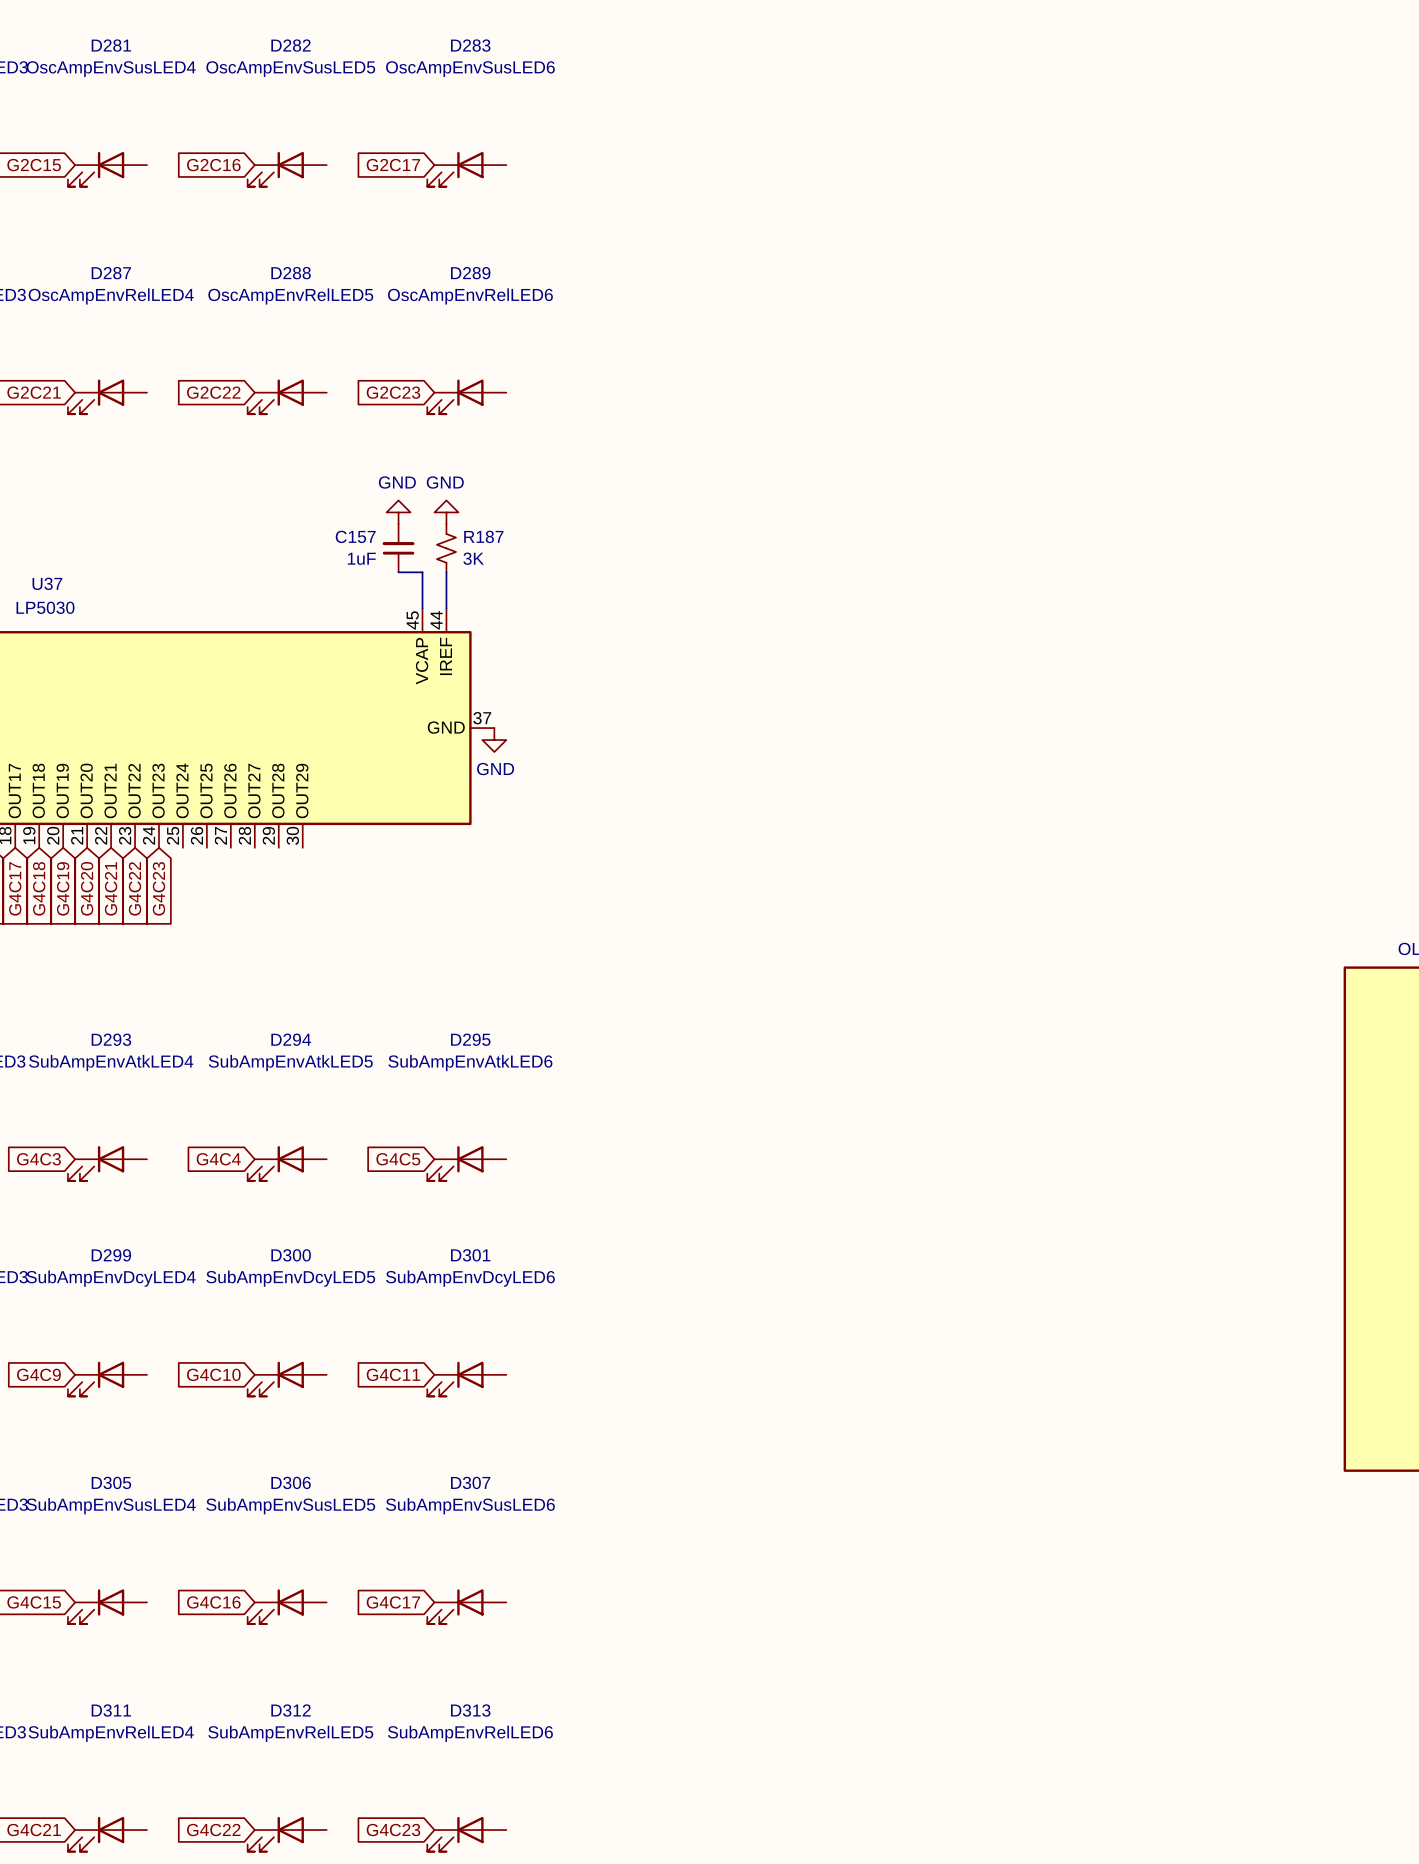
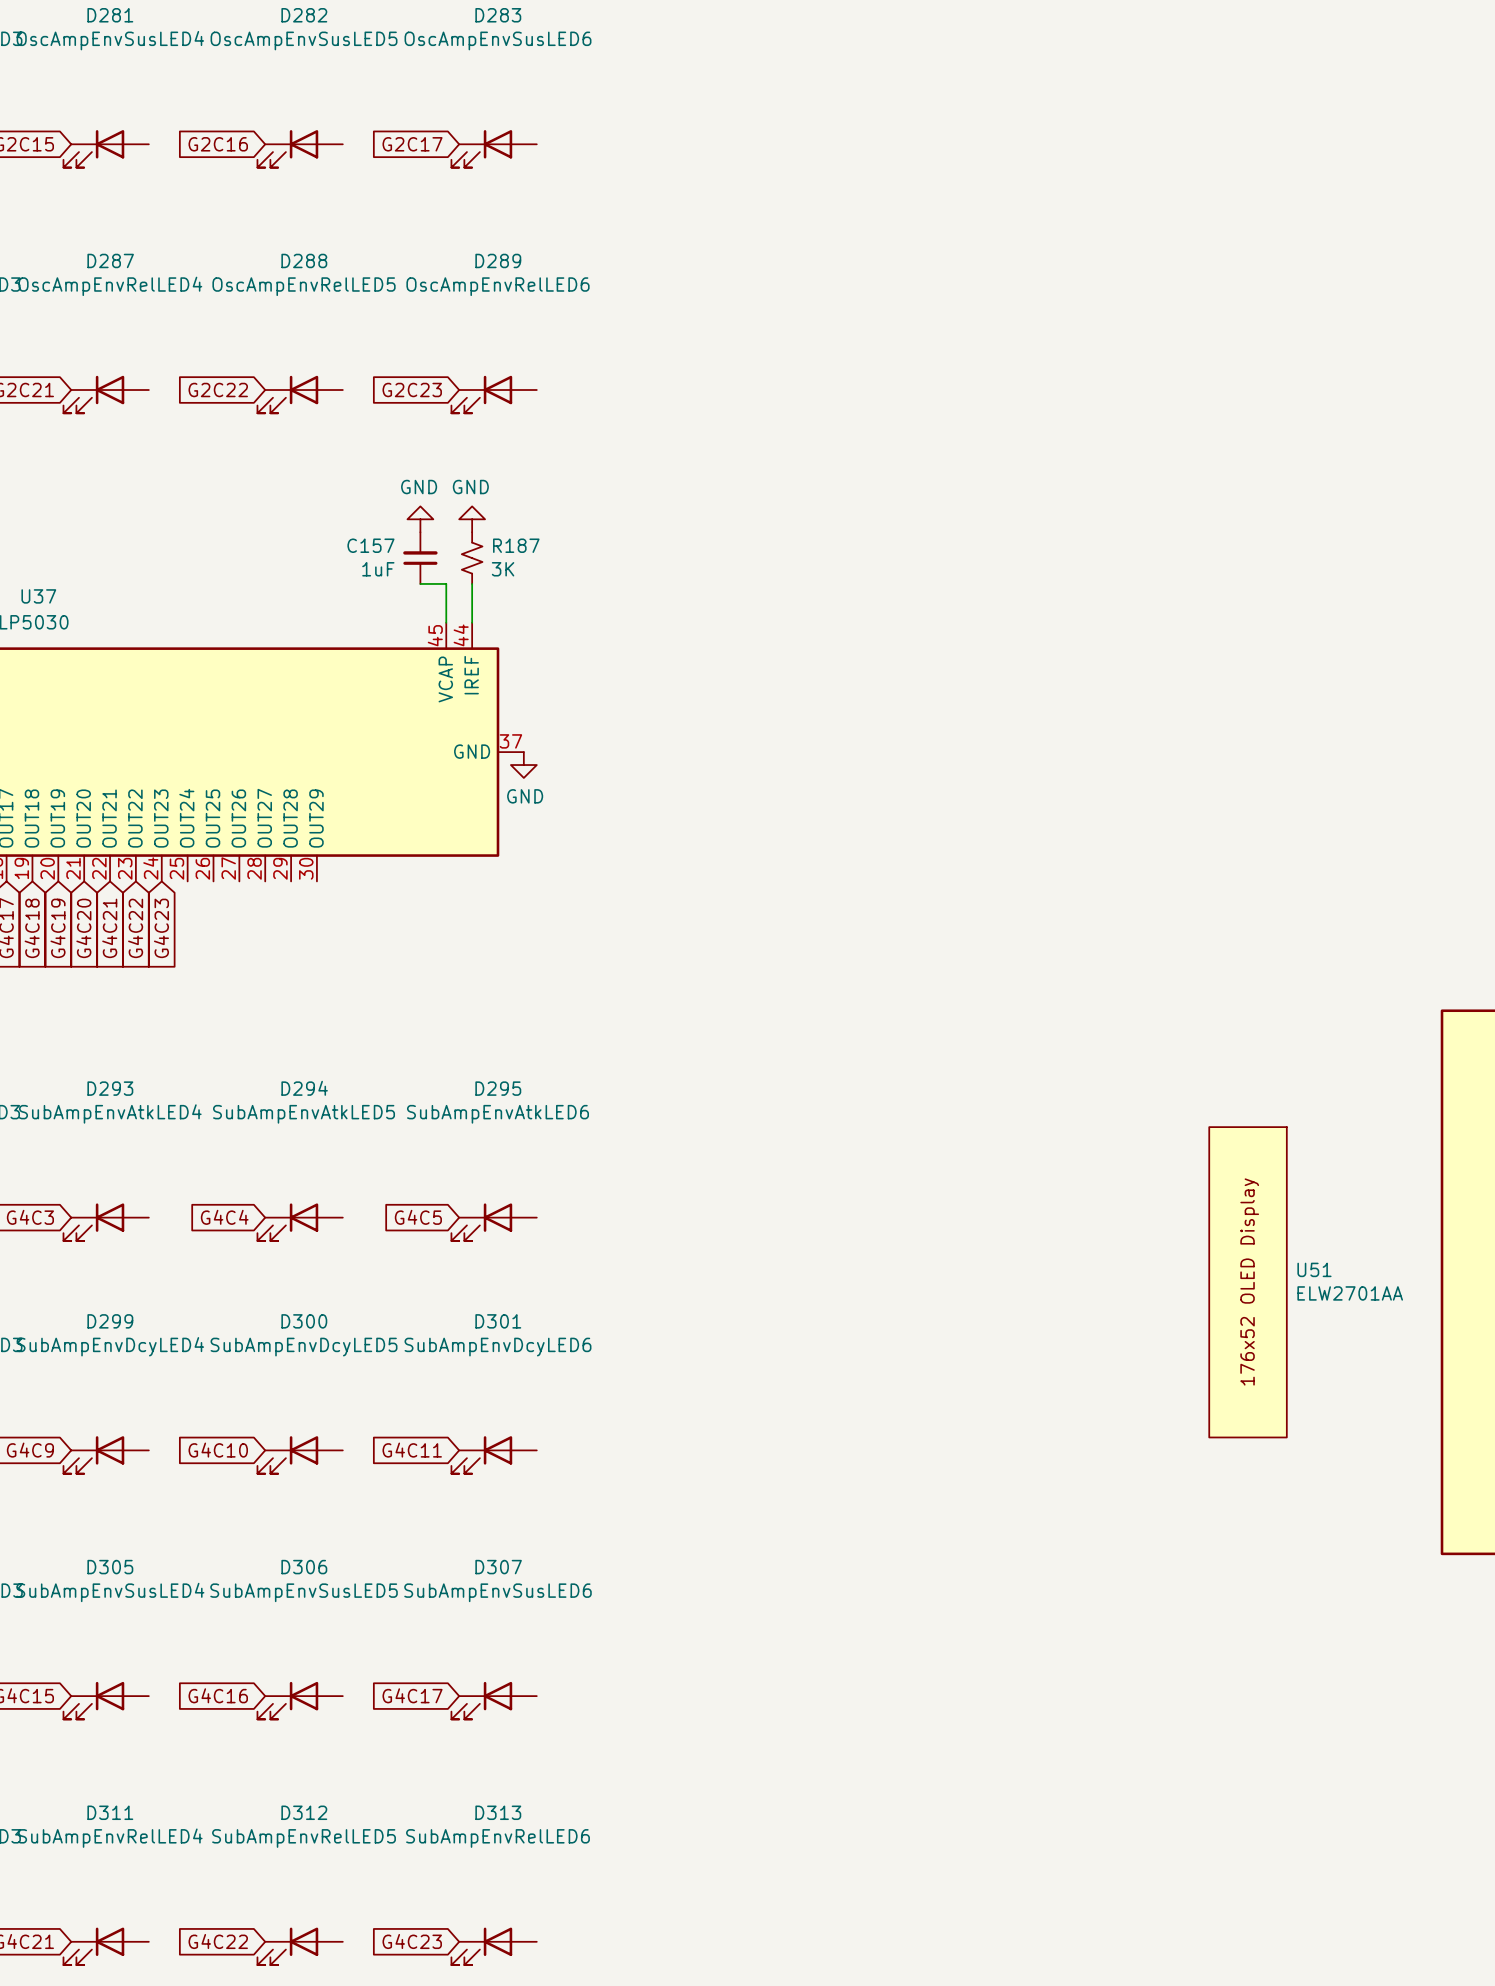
U51: none -> ELW2701AA (1248, 1282)

